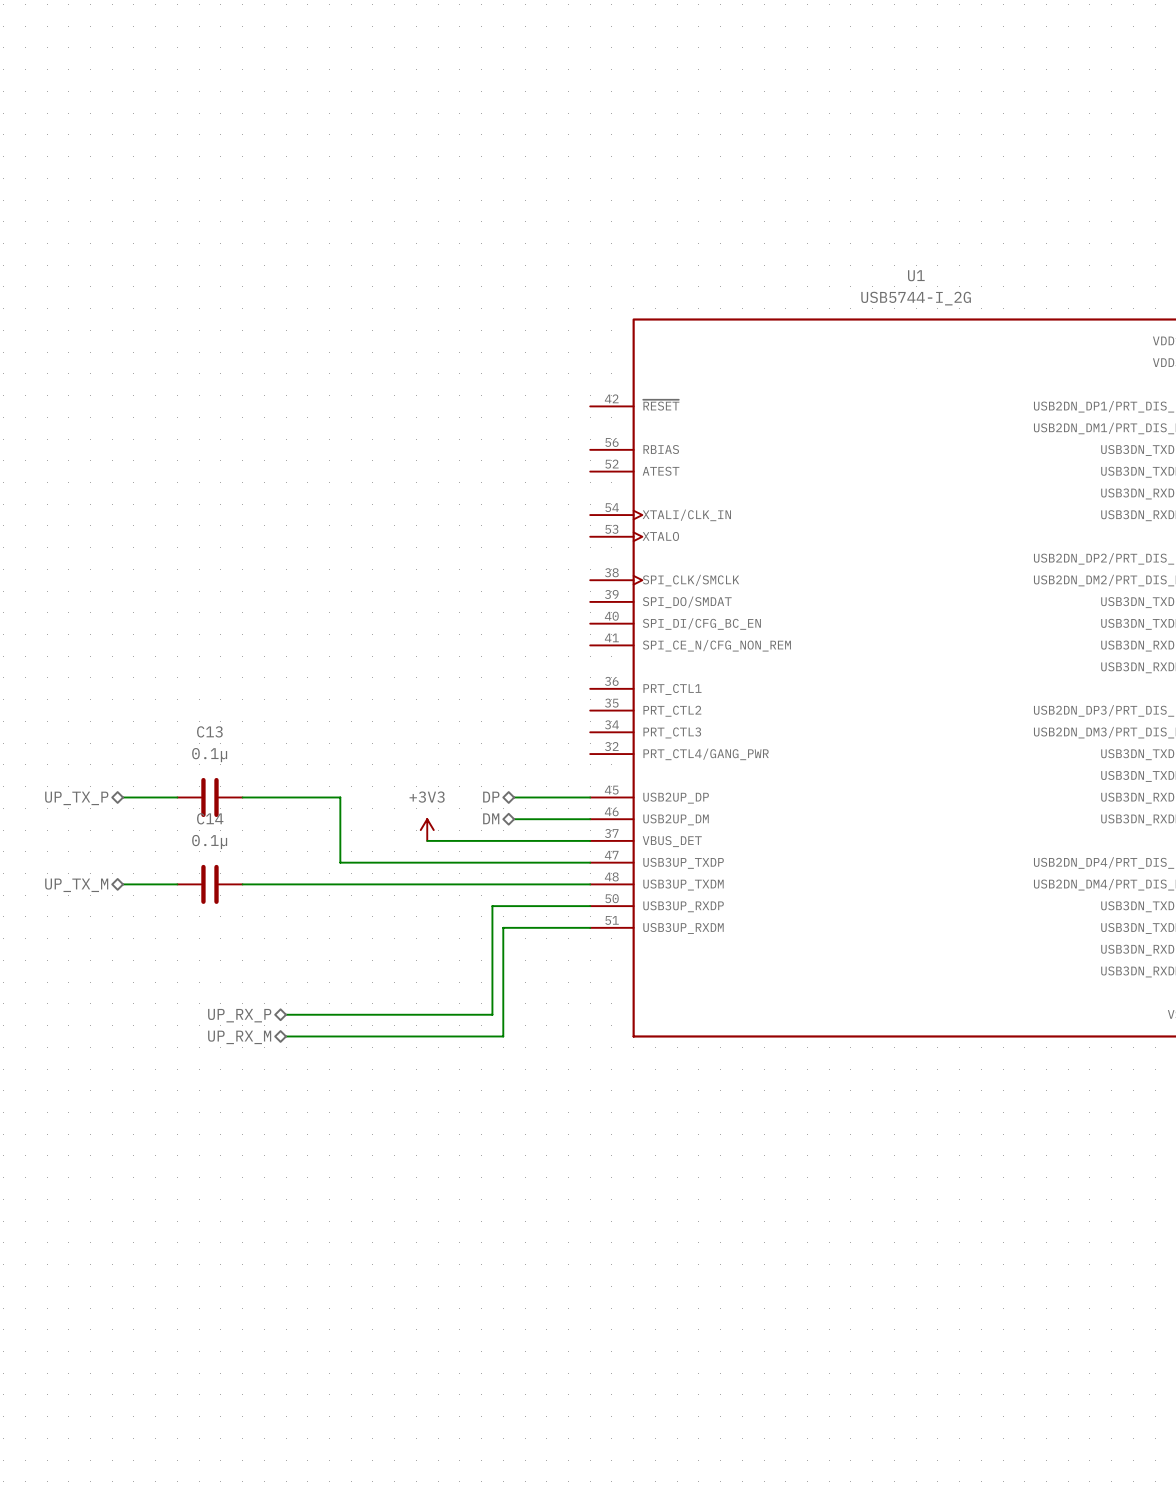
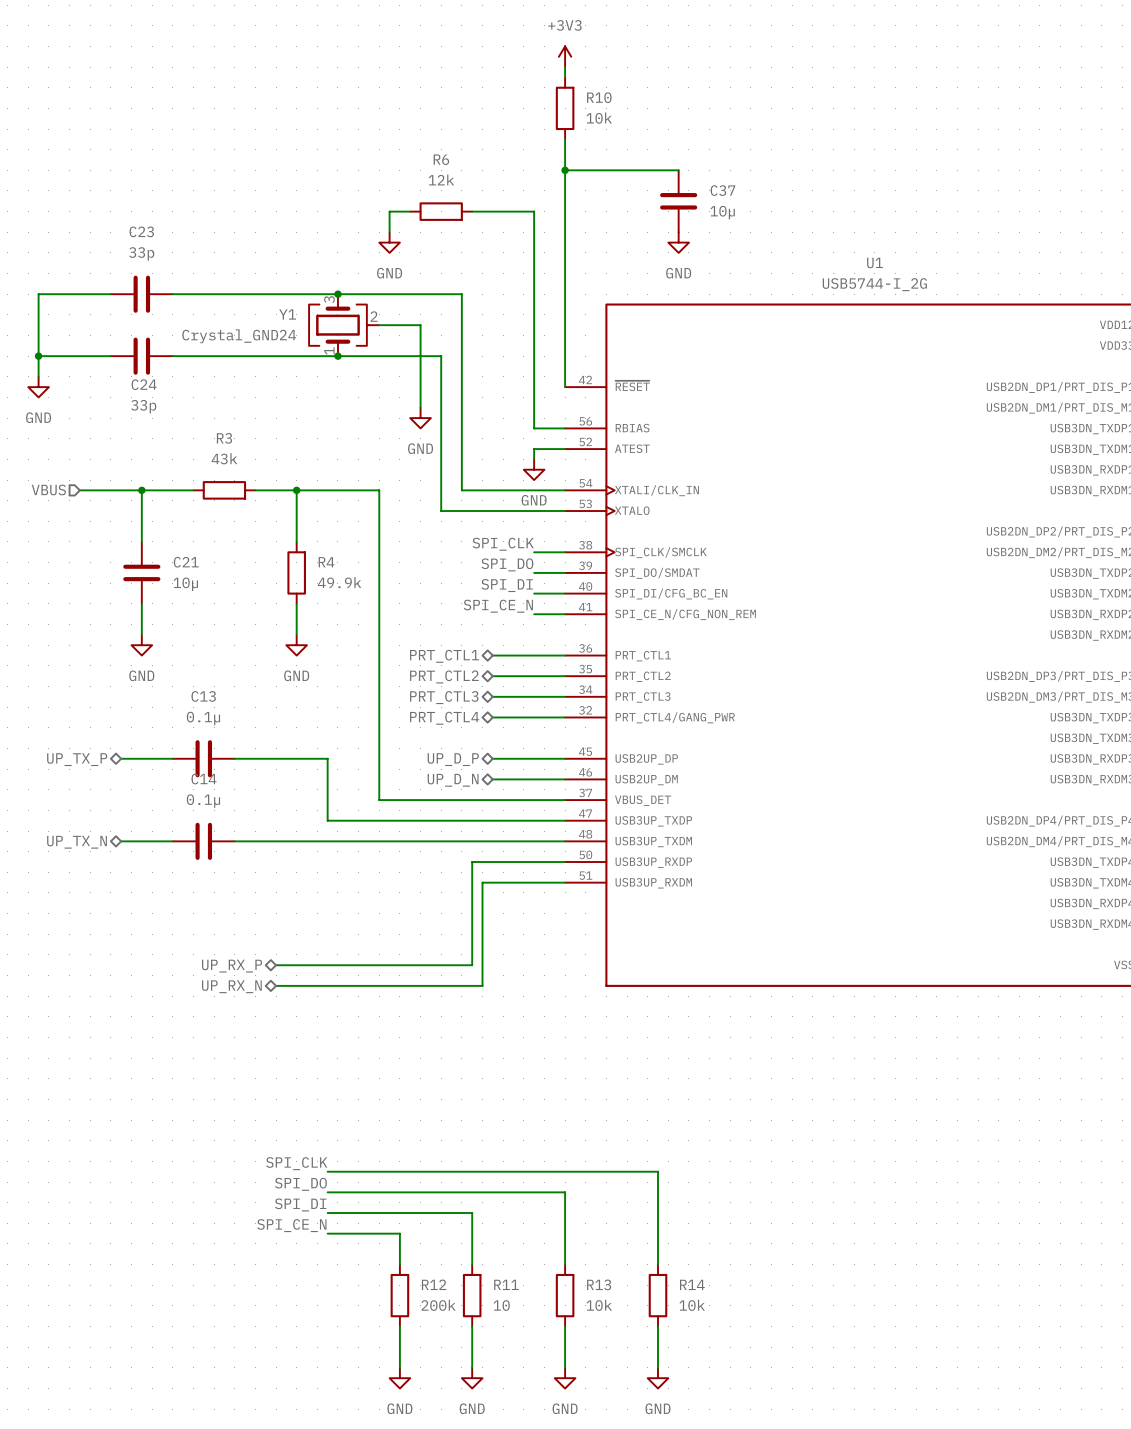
power symbol: none -> +3V3 (565, 56)
wire: none -> (565, 67) (565, 77)
R10: none -> 10k (565, 108)
wire: none -> (565, 139) (565, 387)
wire: none -> (565, 170) (678, 170)
junction: none -> (565, 170)
C37: none -> 10µ (678, 201)
wire: none -> (410, 211) (389, 211) (389, 232)
R6: none -> 12k (441, 211)
wire: none -> (472, 211) (534, 211) (534, 428) (565, 428)
power symbol: none -> GND (389, 242)
power symbol: none -> GND (678, 242)
wire: none -> (110, 294) (38, 294) (38, 376)
C23: none -> 33p (141, 294)
wire: none -> (172, 294) (461, 294) (461, 490) (565, 490)
junction: none -> (337, 294)
Y1: none -> Crystal_GND24 (344, 325)
wire: none -> (379, 325) (420, 325) (420, 407)
wire: none -> (38, 356) (110, 356)
junction: none -> (38, 356)
C24: none -> 33p (141, 356)
wire: none -> (172, 356) (441, 356) (441, 511) (565, 511)
junction: none -> (337, 356)
power symbol: none -> GND (38, 387)
power symbol: none -> GND (420, 418)
wire: none -> (565, 449) (534, 449) (534, 459)
power symbol: none -> GND (534, 469)
hierarchical label: none -> VBUS (48, 489)
wire: none -> (79, 490) (193, 490)
wire: none -> (141, 490) (141, 541)
junction: none -> (141, 490)
R3: none -> 43k (224, 490)
wire: none -> (255, 490) (379, 490) (379, 800) (410, 800)
wire: none -> (296, 490) (296, 541)
junction: none -> (296, 490)
label: none -> SPI_CLK (503, 544)
wire: none -> (534, 552) (565, 552)
label: none -> SPI_DO (507, 564)
C21: none -> 10µ (141, 572)
R4: none -> 49.9k (296, 572)
wire: none -> (534, 572) (565, 572)
label: none -> SPI_DI (507, 585)
wire: none -> (534, 593) (565, 593)
wire: none -> (141, 603) (141, 634)
wire: none -> (296, 603) (296, 634)
label: none -> SPI_CE_N (498, 606)
wire: none -> (534, 614) (565, 614)
power symbol: none -> GND (141, 645)
power symbol: none -> GND (296, 645)
wire: none -> (492, 655) (565, 655)
hierarchical label: none -> PRT_CTL1 (444, 656)
wire: none -> (492, 676) (565, 676)
hierarchical label: none -> PRT_CTL2 (444, 676)
wire: none -> (492, 696) (565, 696)
hierarchical label: none -> PRT_CTL3 (444, 697)
hierarchical label: none -> PRT_CTL4 (444, 718)
wire: none -> (492, 717) (565, 717)
hierarchical label: DP (491, 797) -> UP_D_P (453, 759)
hierarchical label: DM (491, 818) -> UP_D_N (453, 780)
power symbol: +3V3 (427, 830) -> none
hierarchical label: UP_TX_M (76, 885) -> UP_TX_N (77, 842)
hierarchical label: UP_RX_M (239, 1037) -> UP_RX_N (231, 986)
label: none -> SPI_CLK (296, 1163)
wire: none -> (327, 1171) (658, 1171) (658, 1264)
label: none -> SPI_DO (300, 1184)
wire: none -> (327, 1192) (565, 1192) (565, 1264)
label: none -> SPI_DI (300, 1204)
wire: none -> (327, 1213) (472, 1213) (472, 1264)
label: none -> SPI_CE_N (291, 1225)
wire: none -> (327, 1233) (399, 1233) (399, 1264)
R12: none -> 200k (399, 1295)
R11: none -> 10 (472, 1295)
R13: none -> 10k (565, 1295)
R14: none -> 10k (658, 1295)
wire: none -> (399, 1326) (399, 1367)
wire: none -> (472, 1326) (472, 1367)
wire: none -> (565, 1326) (565, 1367)
wire: none -> (658, 1326) (658, 1367)
power symbol: none -> GND (399, 1378)
power symbol: none -> GND (472, 1378)
power symbol: none -> GND (565, 1378)
power symbol: none -> GND (658, 1378)

